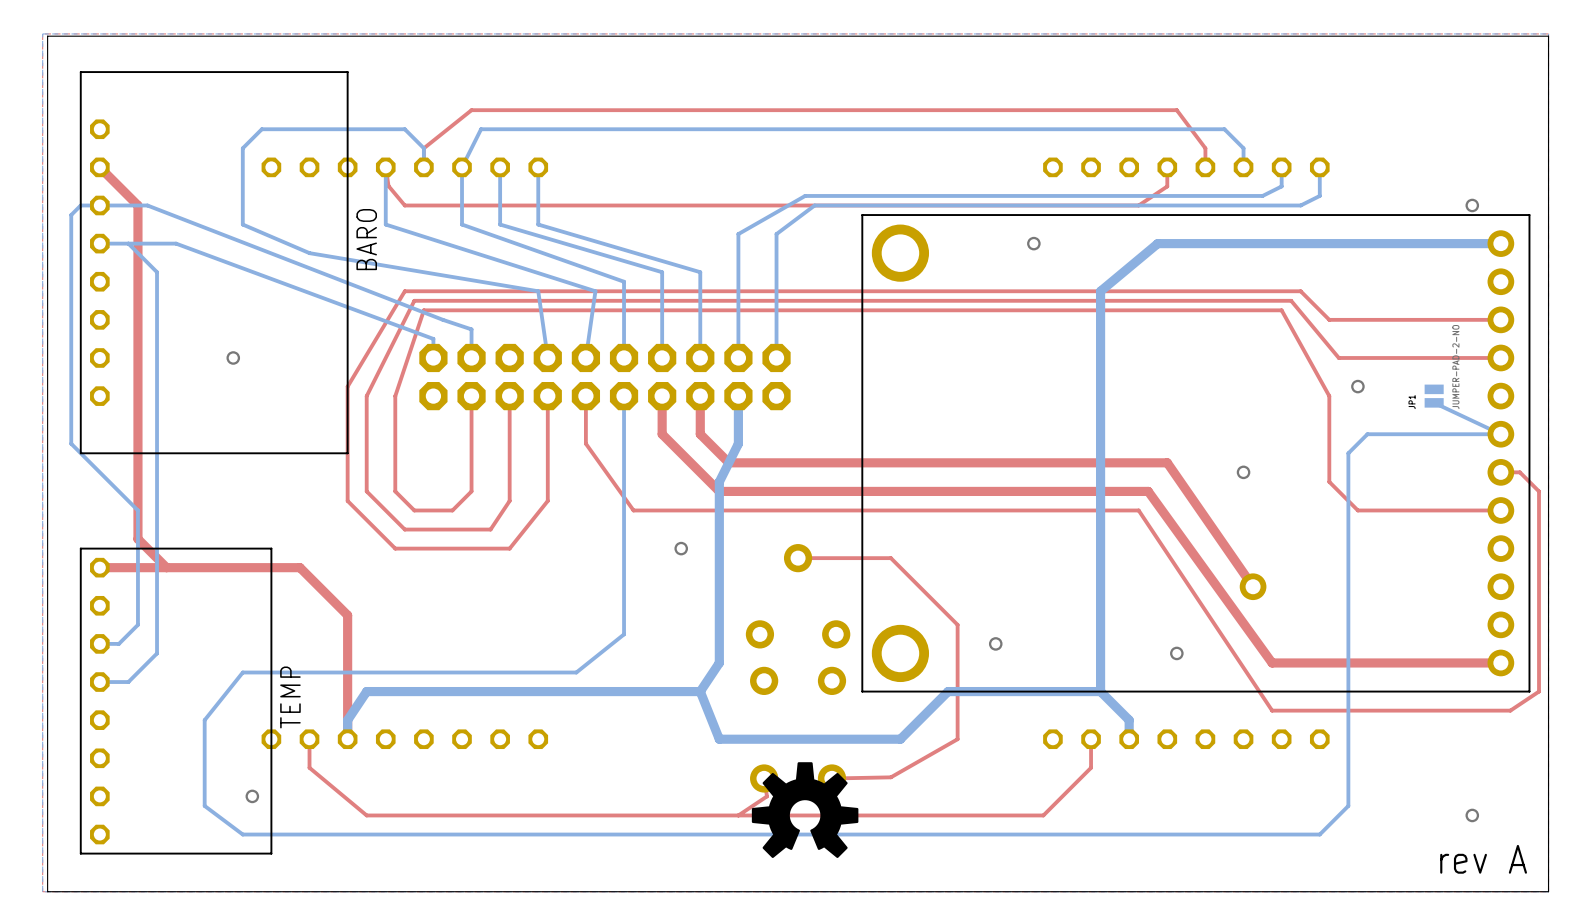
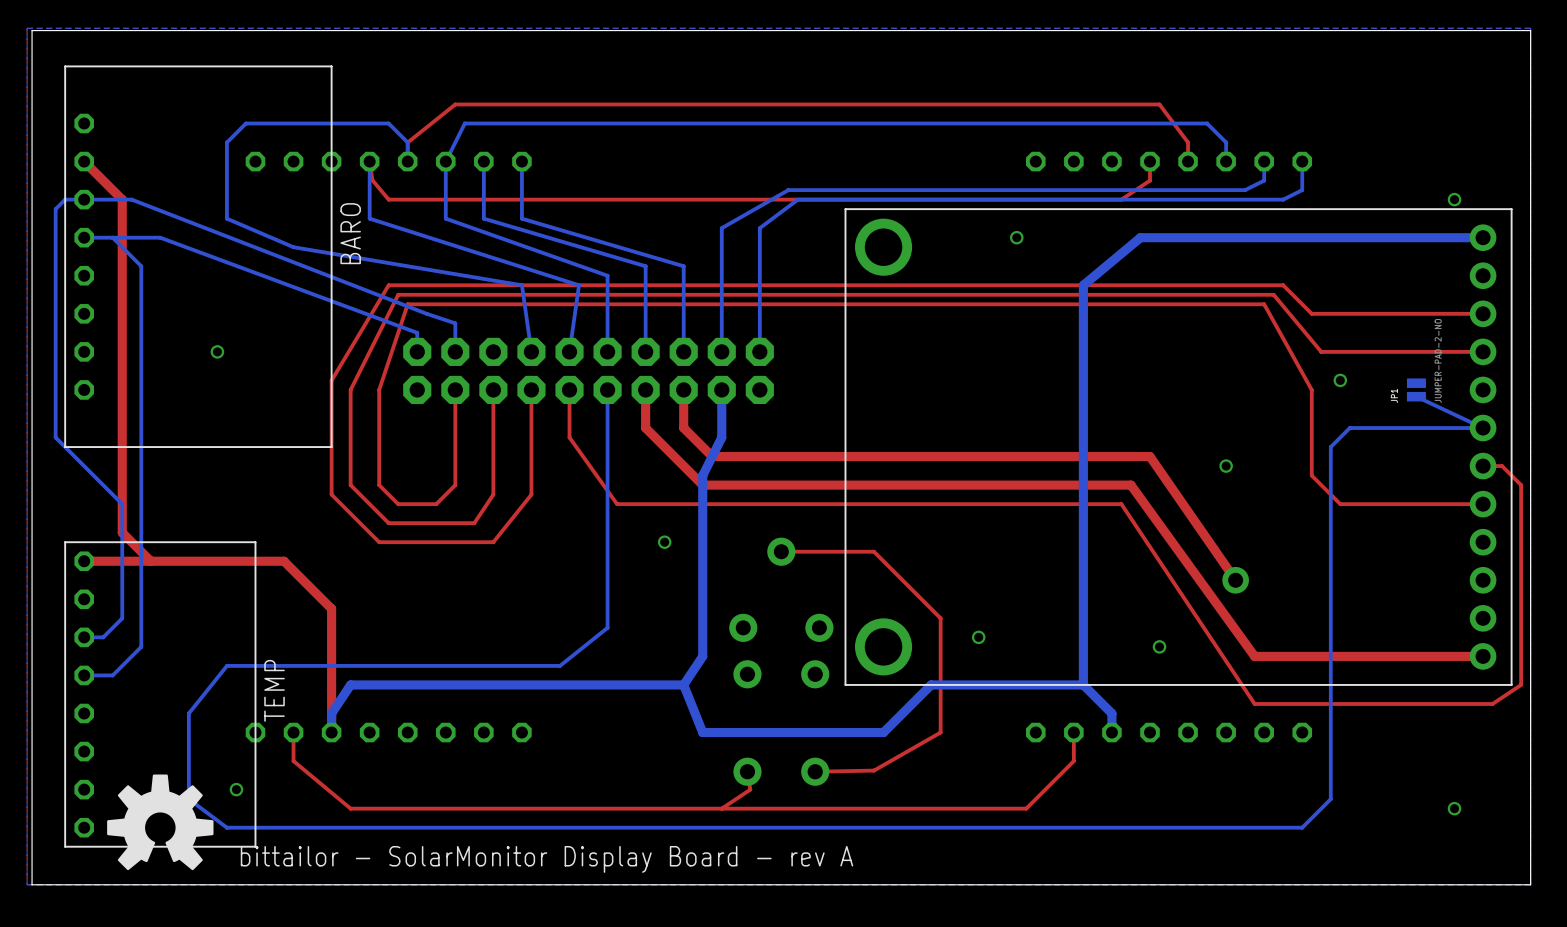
drawing: [751, 762, 859, 858] -> none
drawing: none -> [107, 774, 214, 871]
text: rev A (1483, 859) -> none
text: none -> bittailor - SolarMonitor Display Board - rev A (547, 859)

